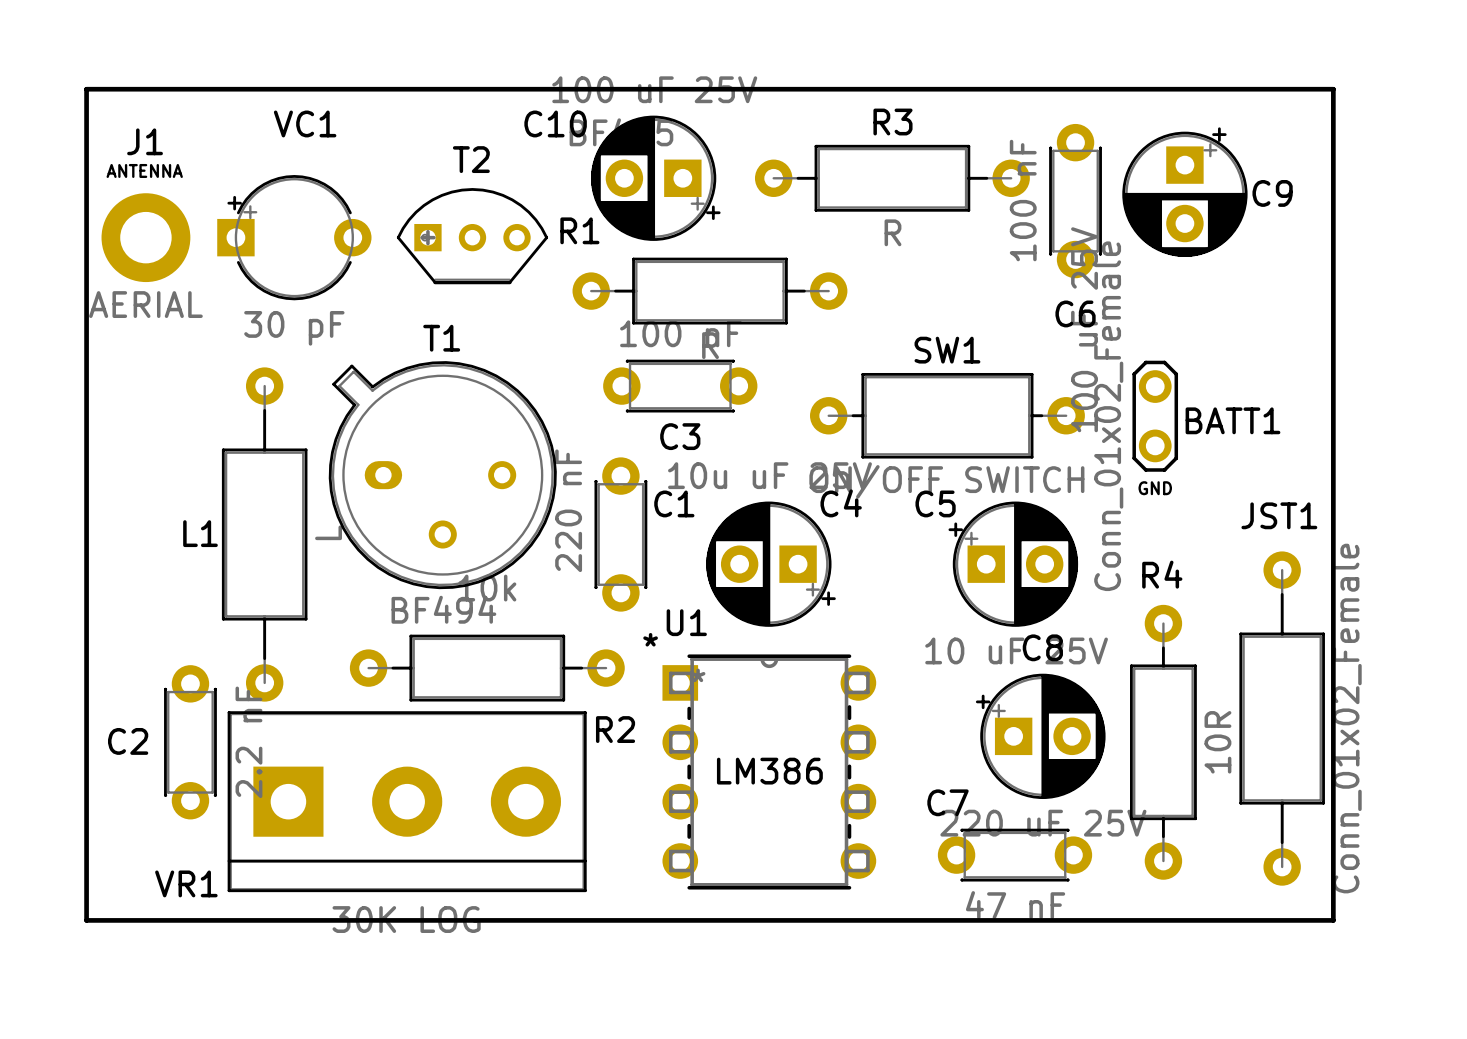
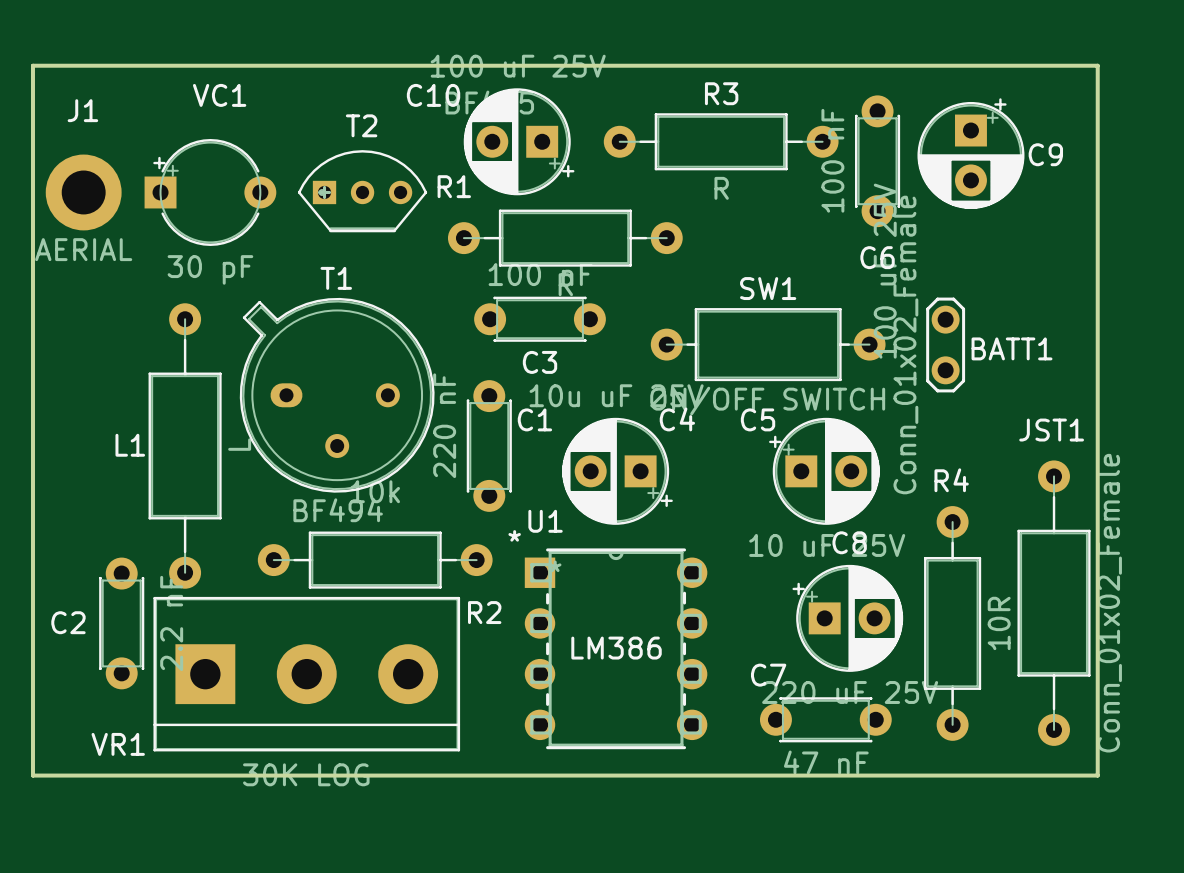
text: ANTENNA (144, 170) -> none
text: GND (1155, 488) -> none

